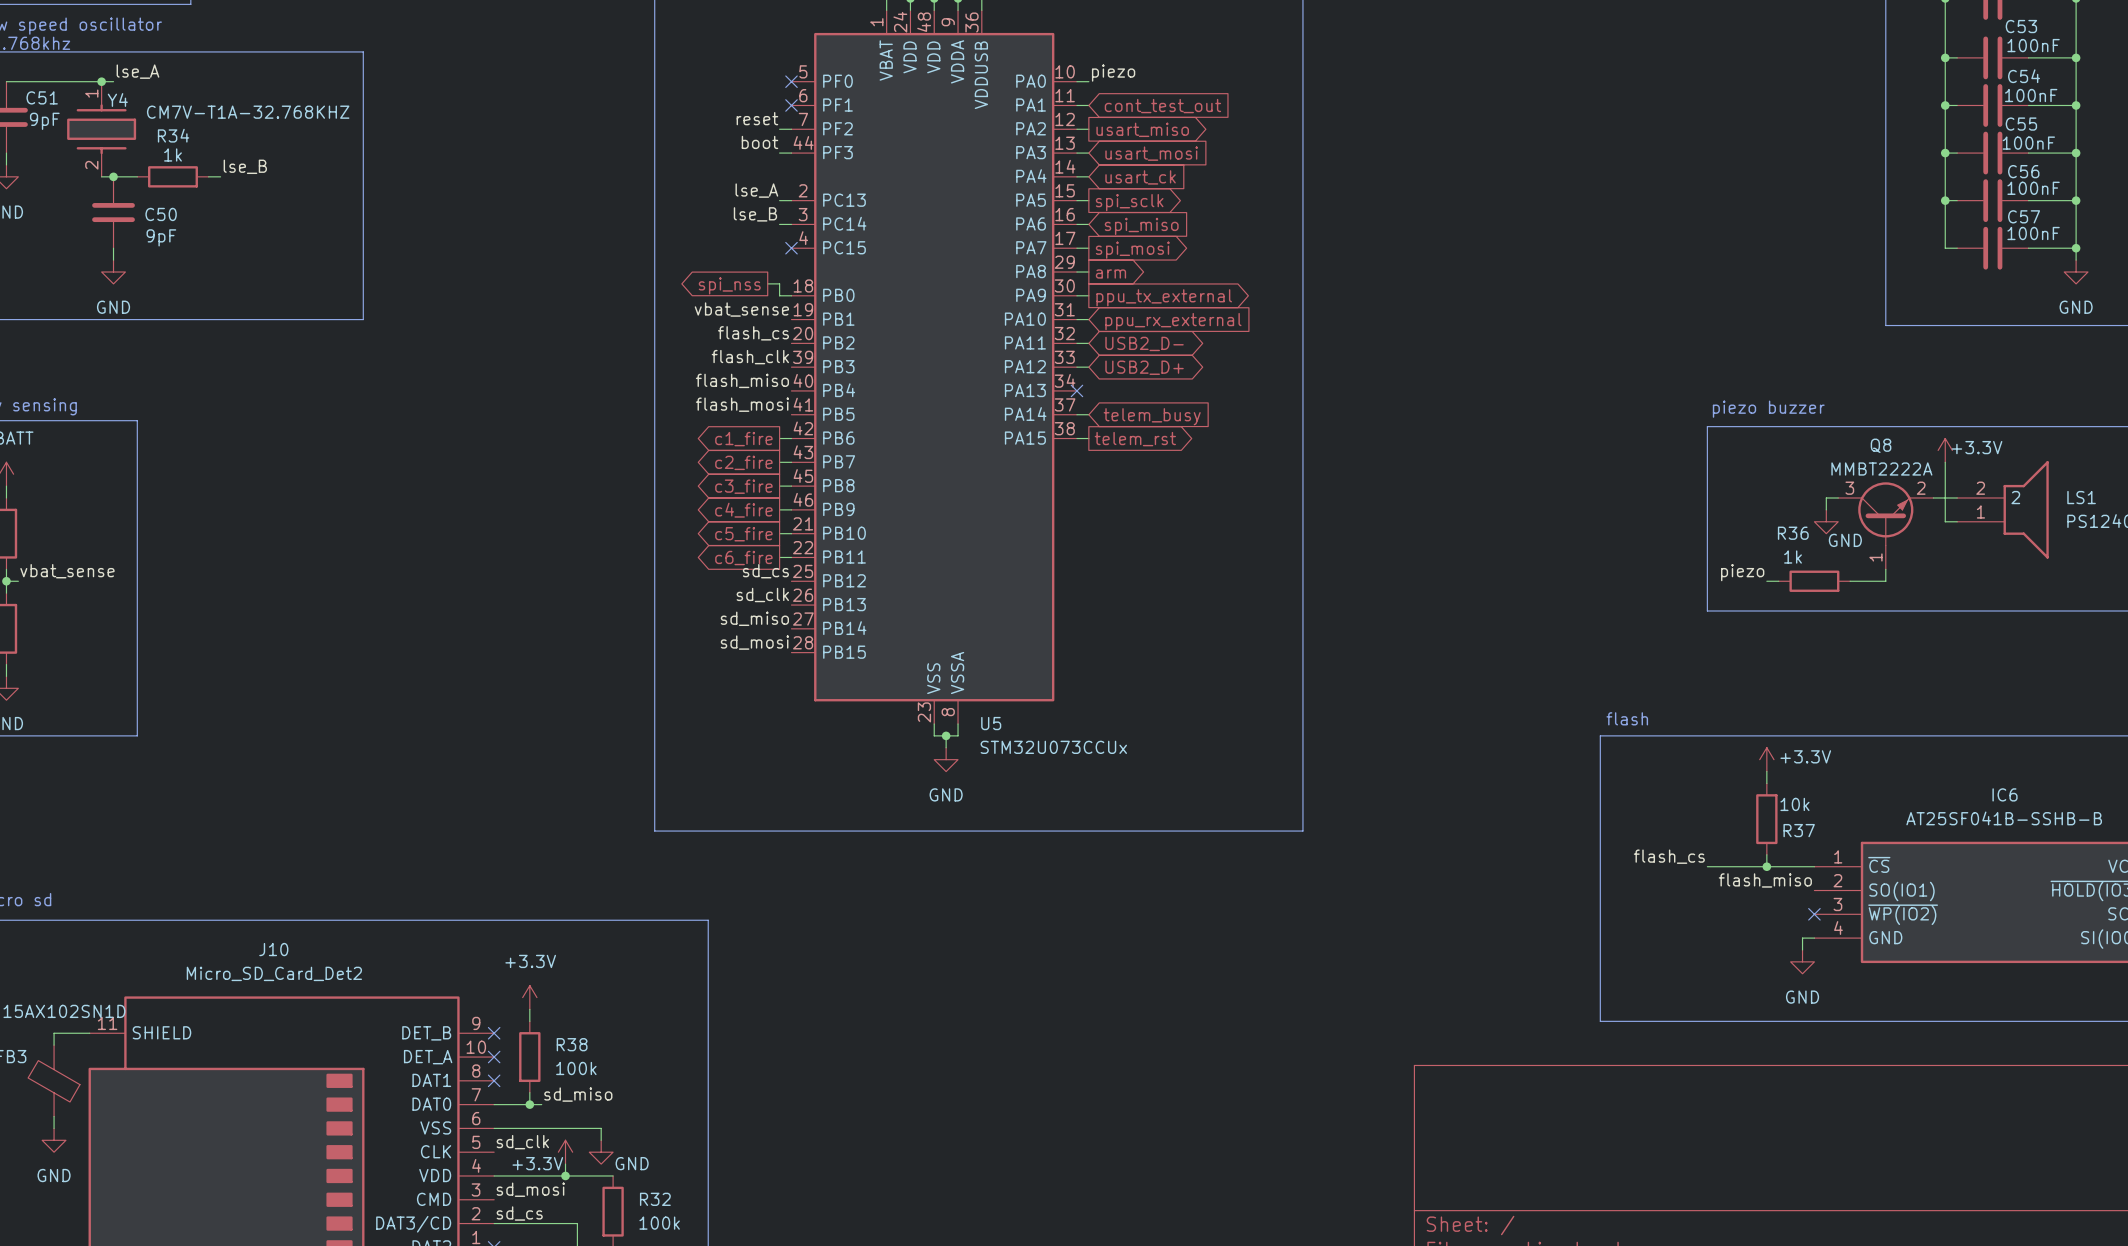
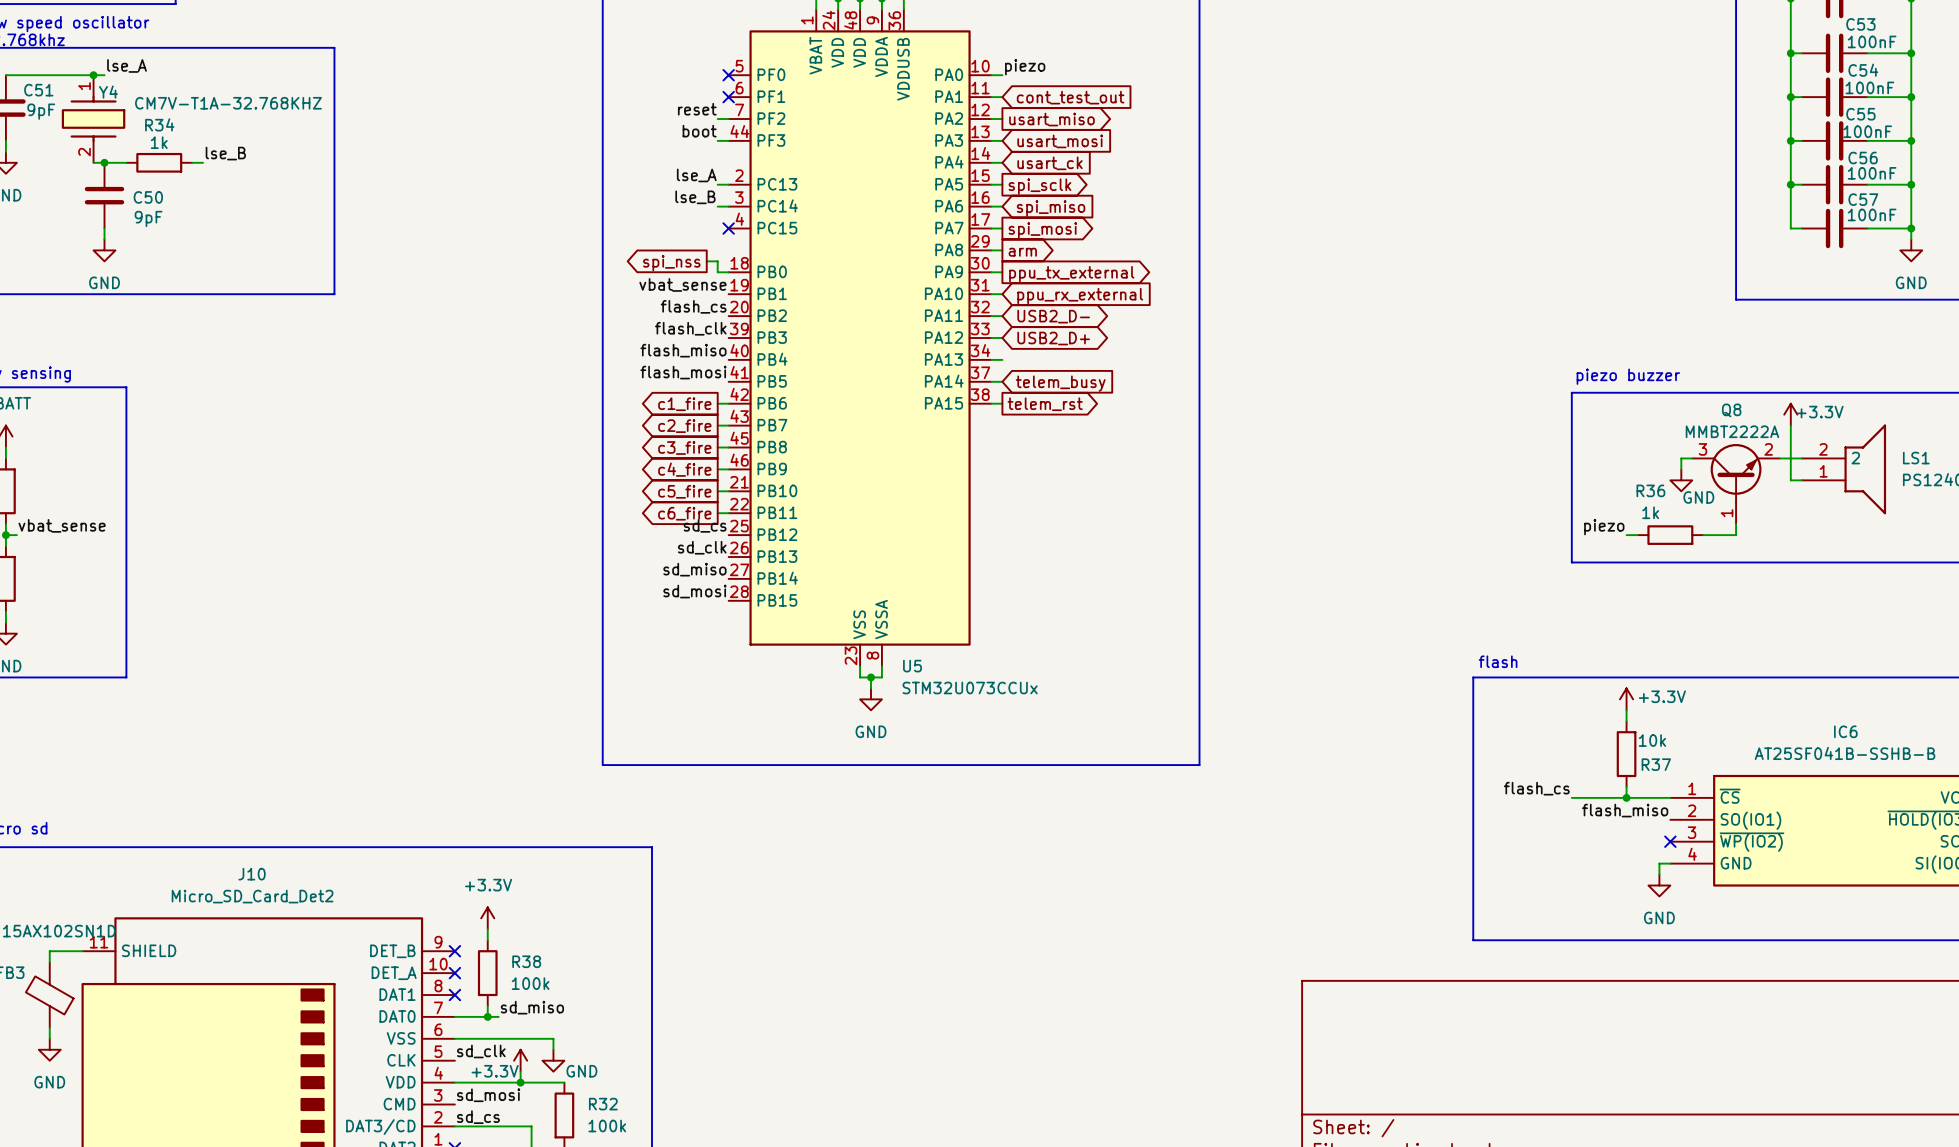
wire: none -> (991, 359) (1002, 359)
no-connect mark: (1076, 390) -> none

